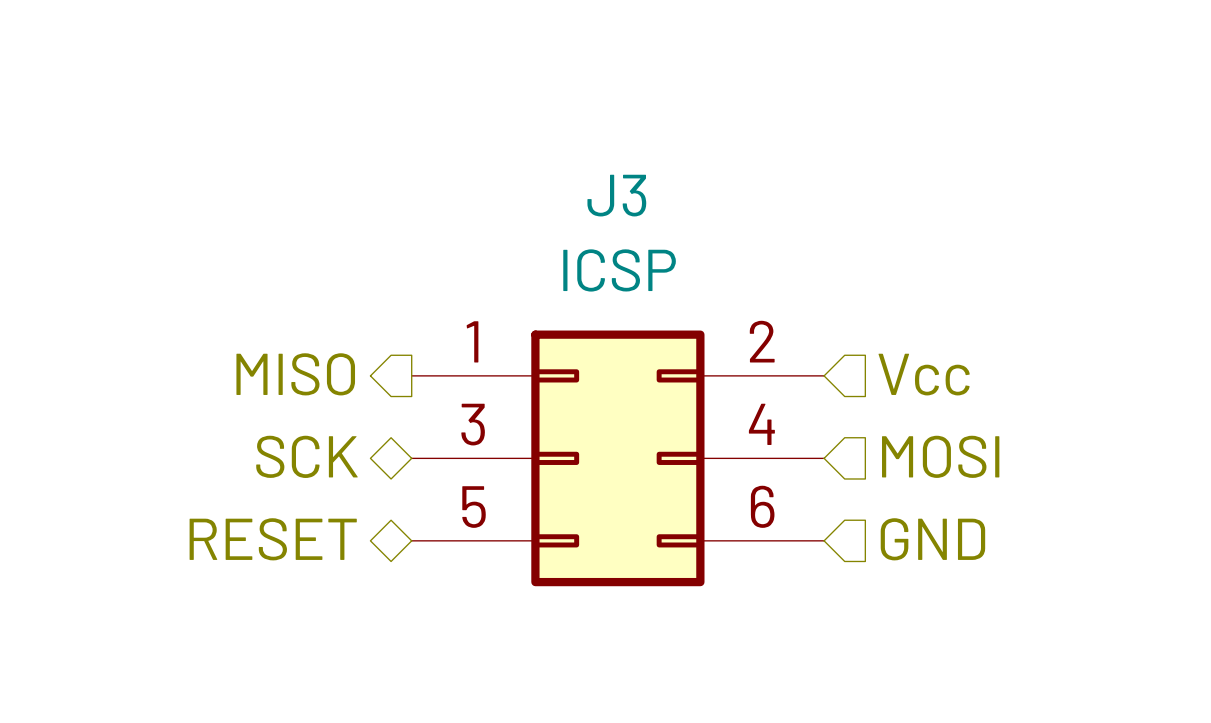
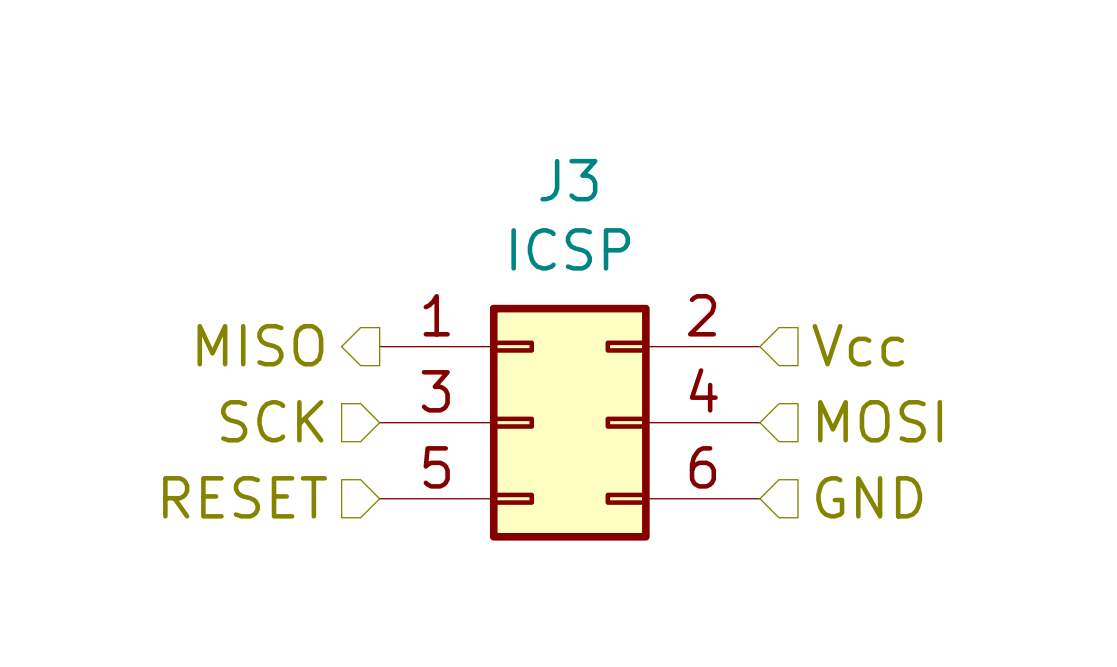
hierarchical label shape: bidirectional (306, 456) -> input (272, 421)
hierarchical label shape: bidirectional (273, 539) -> input (245, 497)

